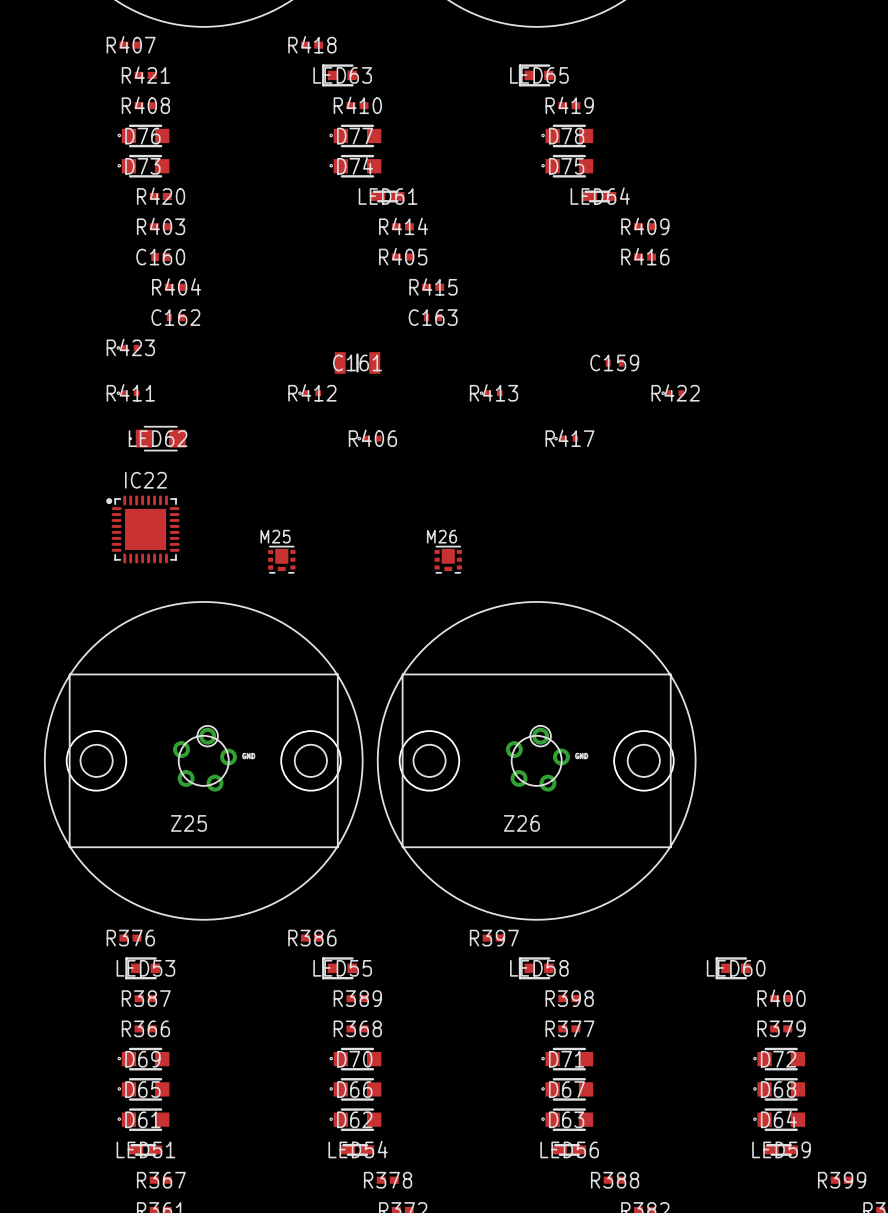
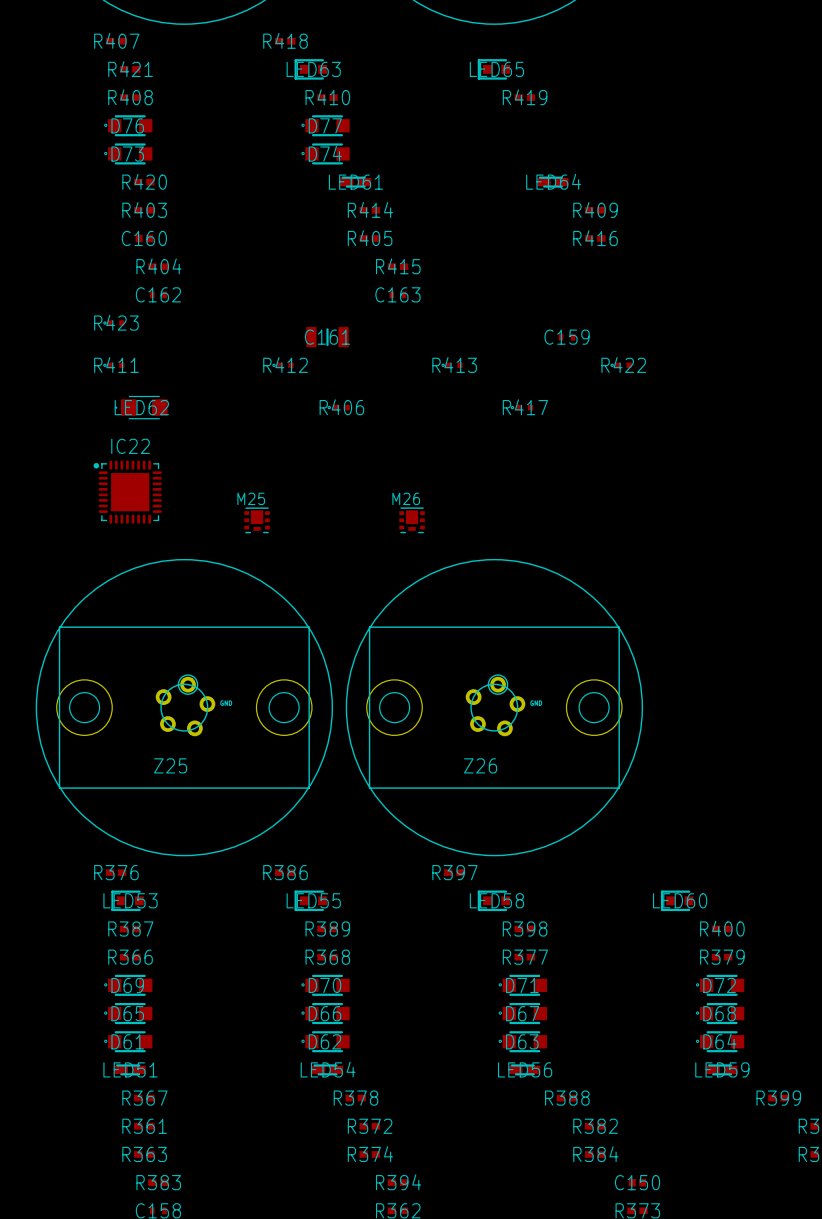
D78: (567, 135) -> none
D75: (567, 166) -> none

